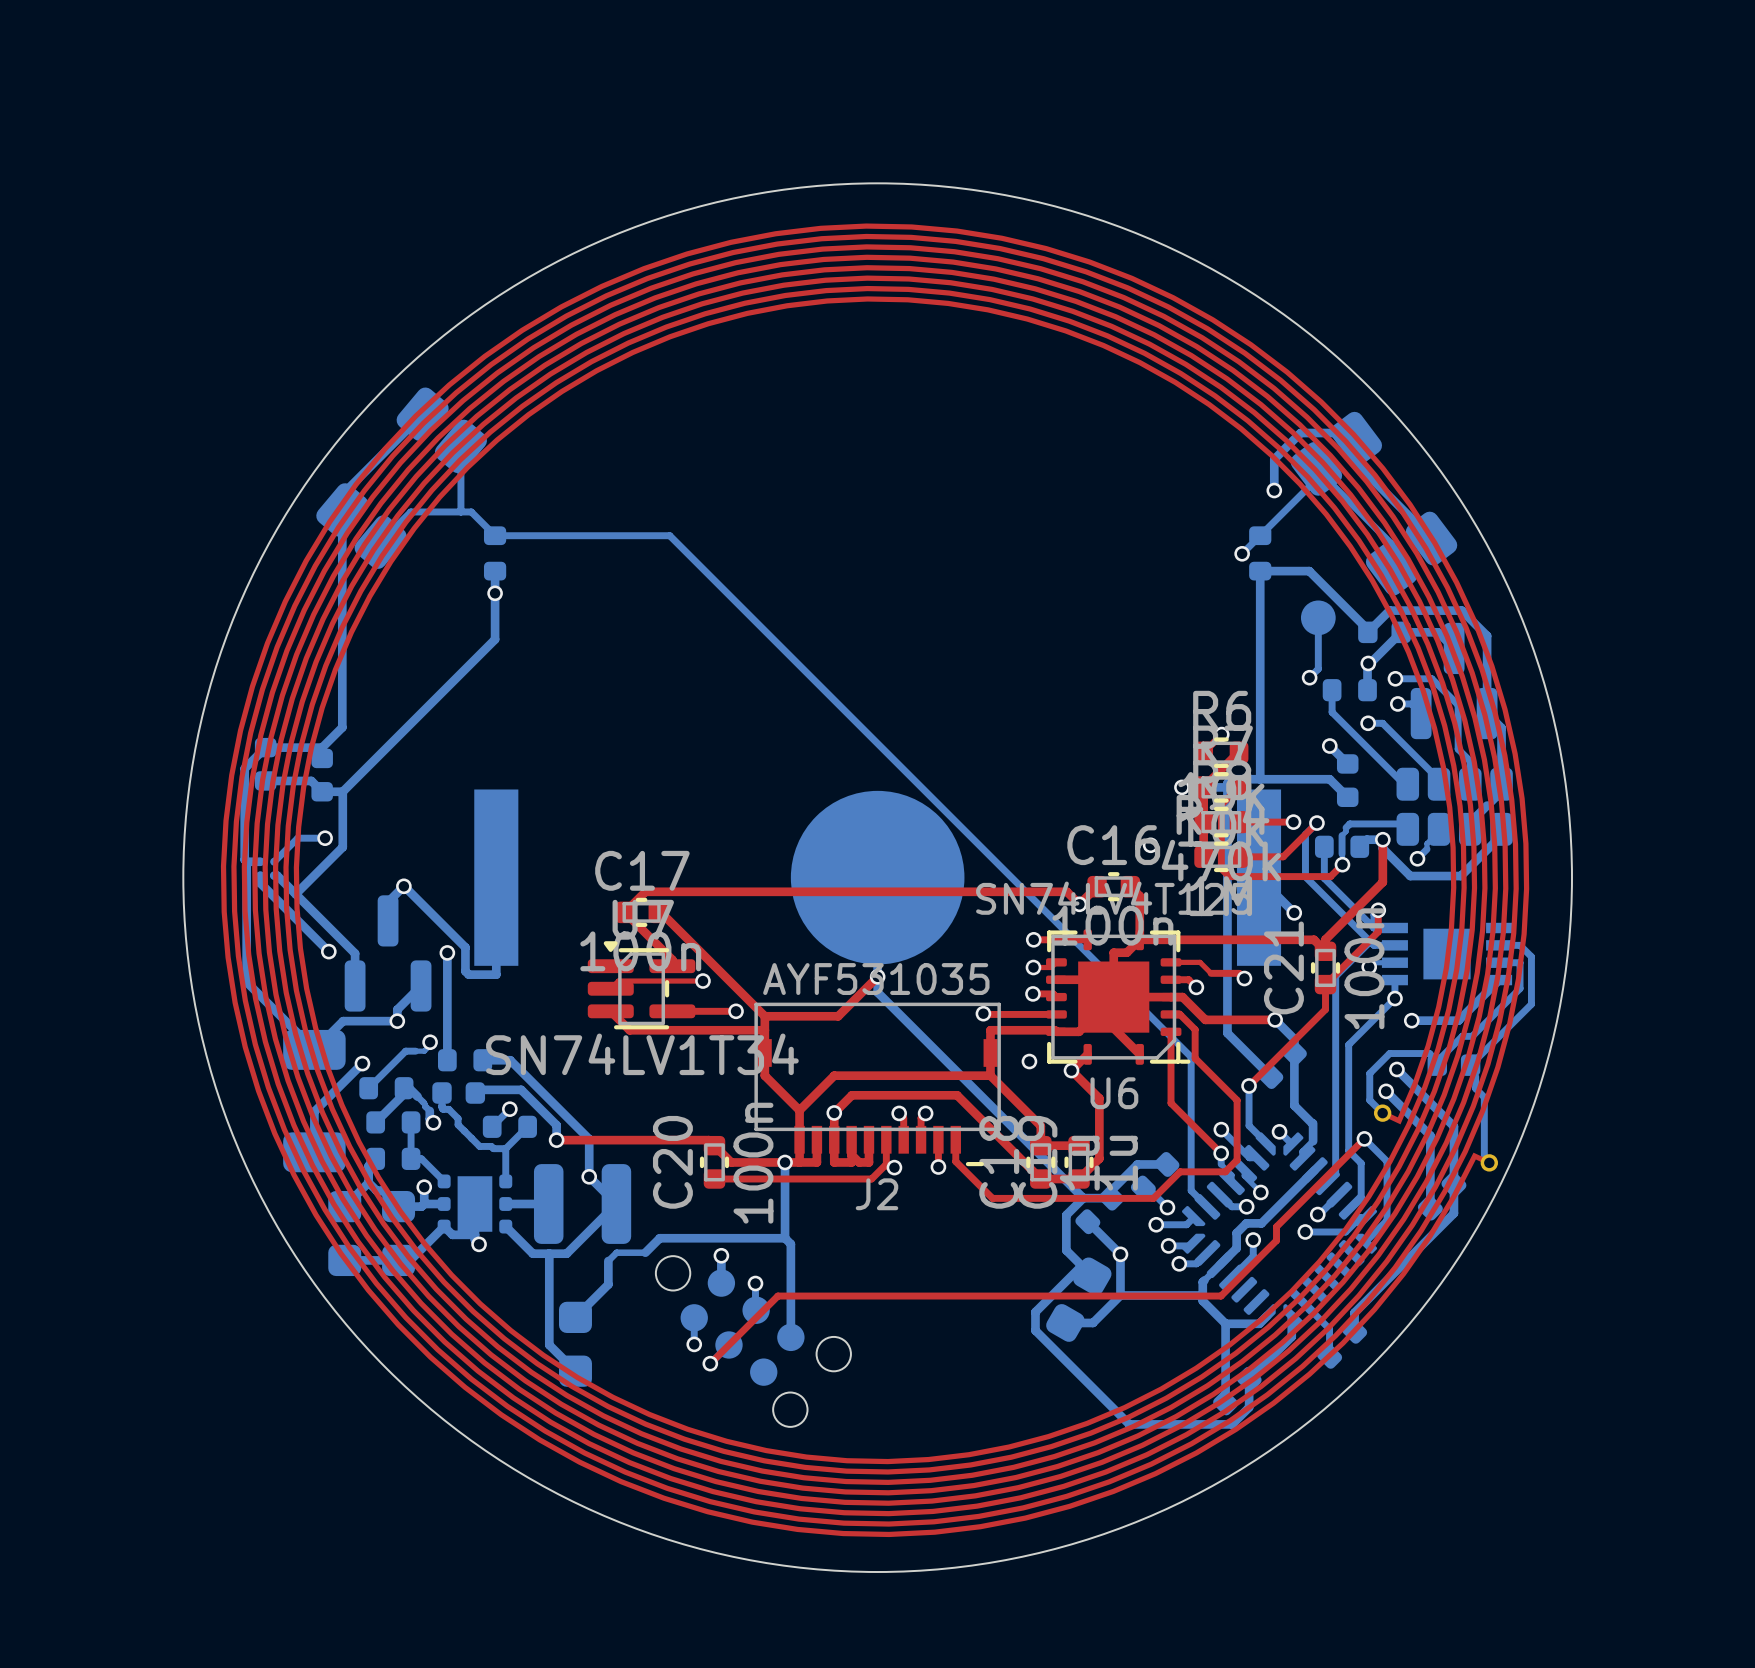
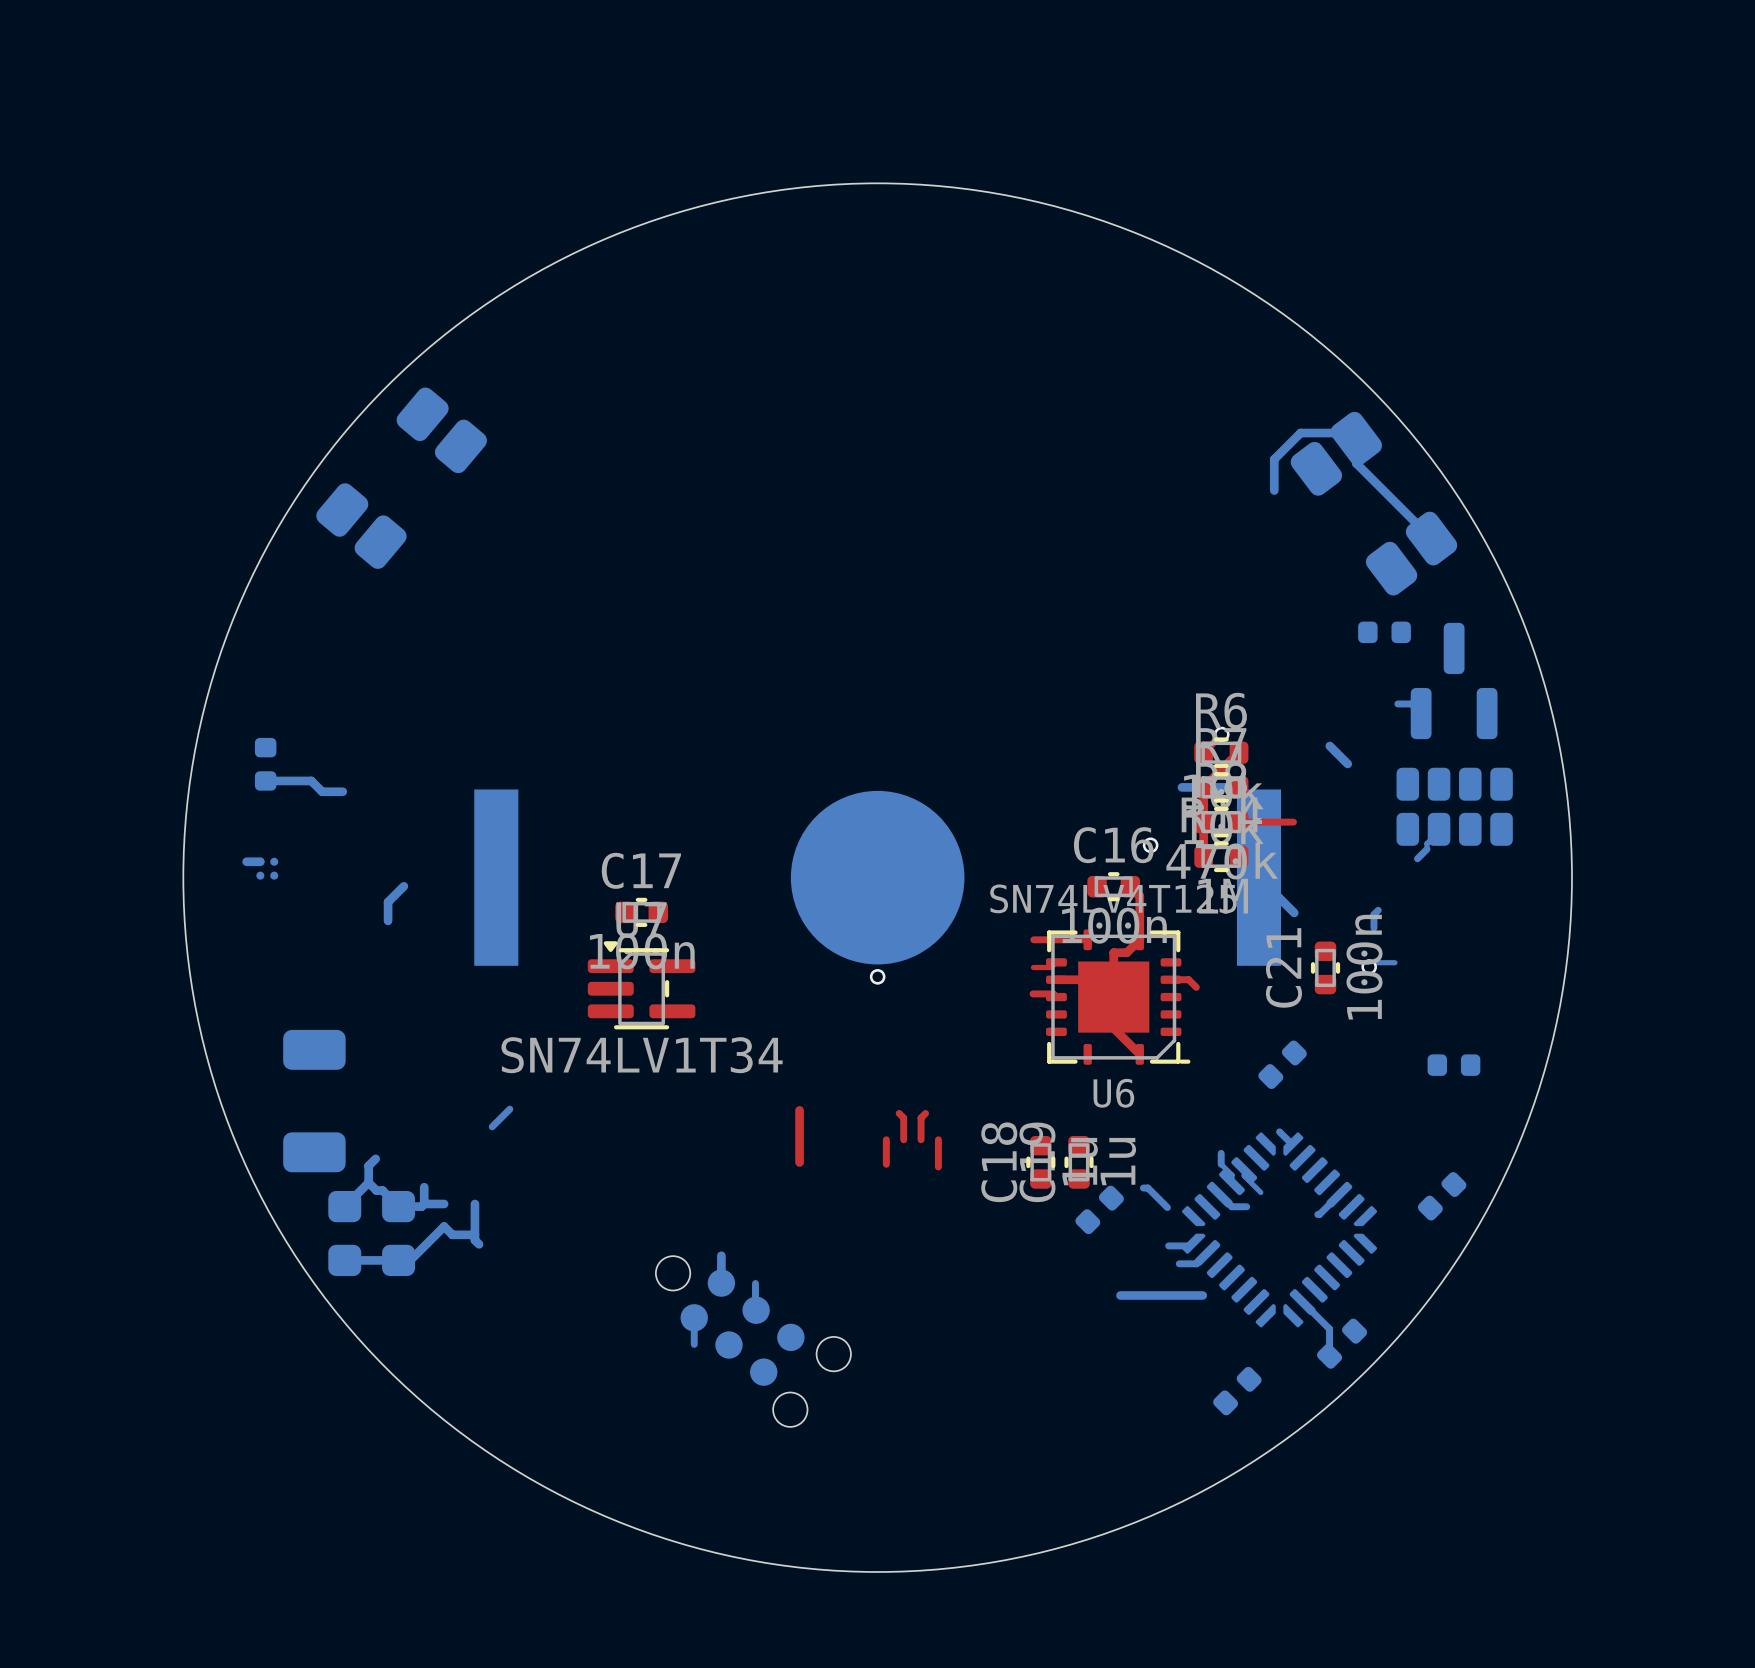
bottom track: (422, 414) (342, 494) (342, 727) (322, 747) -> none
bottom track: (460, 446) (460, 511) -> none
via: (1274, 490) -> none
bottom track: (380, 542) (410, 511) (471, 511) (495, 535) (669, 535) (1191, 1057) (1191, 1190) (1207, 1206) -> none
part: (495, 553) -> none
bottom track: (1242, 553) (1316, 479) (1316, 468) (1391, 544) (1391, 568) -> none
via: (1242, 553) -> none
part: (1260, 553) -> none
bottom track: (495, 571) (495, 639) (342, 791) (342, 847) (295, 894) -> none
via: (495, 593) -> none
bottom track: (1318, 617) (1318, 668) (1309, 677) -> none
part: (1318, 617) -> none
bottom track: (1454, 648) (1438, 632) (1401, 632) (1367, 664) (1367, 690) -> none
via: (1368, 663) -> none
via: (1309, 677) -> none
bottom track: (1395, 678) (1431, 678) (1458, 705) (1458, 749) (1470, 761) (1470, 784) -> none
via: (1395, 678) -> none
bottom track: (1332, 690) (1332, 712) (1404, 784) (1407, 784) -> none
part: (1349, 690) -> none
via: (1397, 703) -> none
bottom track: (1368, 723) (1382, 723) (1439, 779) (1439, 784) -> none
via: (1368, 723) -> none
via: (1329, 746) -> none
bottom track: (322, 747) (265, 747) (244, 768) (246, 982) (314, 1049) (343, 1021) (397, 1021) (397, 1009) (421, 985) -> none
part: (322, 775) -> none
bottom track: (1260, 779) (1260, 571) (1309, 571) (1367, 629) (1367, 632) (1389, 610) (1461, 610) (1487, 635) (1487, 713) (1501, 727) (1501, 792) (1470, 822) (1470, 829) -> none
part: (1347, 780) -> none
via: (1181, 787) -> none
top track: (1238, 787) (1221, 804) (1221, 868) (1229, 876) (1330, 876) (1342, 864) -> none
bottom track: (1347, 797) (1329, 779) (1231, 779) (1227, 783) (1227, 1033) (1270, 1076) -> none
via: (1293, 822) -> none
top track: (1316, 823) (1283, 856) (1239, 856) -> none
bottom track: (1316, 823) (1305, 834) (1305, 876) (1373, 945) (1394, 945) -> none
via: (1316, 823) -> none
bottom track: (1407, 829) (1402, 823) (1349, 823) (1342, 835) (1342, 854) -> none
bottom track: (1501, 829) (1501, 835) (1460, 876) (1410, 876) (1382, 848) (1382, 839) (1366, 839) (1359, 846) -> none
bottom track: (325, 838) (297, 838) (274, 861) -> none
via: (325, 838) -> none
top track: (1382, 839) (1382, 882) (1325, 939) (1325, 951) (1314, 939) (1139, 939) -> none
via: (1382, 839) -> none
bottom track: (1324, 846) (1324, 878) (1373, 928) (1394, 928) -> none
part: (1342, 846) -> none
via: (1417, 858) -> none
via: (1342, 864) -> none
bottom track: (260, 875) (260, 883) (328, 951) -> none
bottom track: (274, 875) (277, 875) (355, 953) (355, 985) -> none
bottom track: (496, 877) (496, 974) (468, 974) (465, 971) (465, 947) (404, 886) -> none
bottom track: (877, 877) (877, 992) (1083, 1198) -> none
part: (875, 880) -> none
via: (403, 886) -> none
top track: (1097, 886) (1079, 904) (1066, 891) (645, 891) (624, 912) (672, 959) (672, 966) -> none
via: (1079, 904) -> none
top track: (1378, 910) (1378, 931) (1325, 984) (1325, 1009) (1249, 1085) -> none
via: (1378, 910) -> none
top track: (658, 912) (660, 912) (764, 1016) -> none
via: (1294, 912) -> none
via: (1033, 939) -> none
bottom track: (1370, 941) (1335, 976) (1335, 1173) (1327, 1182) -> none
bottom track: (1499, 945) (1520, 945) (1531, 956) (1531, 1004) (1470, 1065) -> none
via: (328, 951) -> none
bottom track: (447, 952) (447, 1060) -> none
via: (447, 952) -> none
part: (388, 953) -> none
part: (1447, 954) -> none
top track: (1171, 962) (1200, 962) (1211, 973) (1239, 973) (1244, 978) -> none
bottom track: (1499, 962) (1520, 962) (1520, 988) (1472, 1036) (1462, 1036) (1437, 1061) -> none
via: (1033, 967) -> none
top track: (877, 976) (838, 1016) (764, 1016) -> none
via: (1244, 978) -> none
bottom track: (1394, 980) (1394, 998) (1348, 1044) (1348, 1150) (1361, 1163) (1361, 1197) (1351, 1206) -> none
bottom track: (1499, 980) (1458, 1020) (1411, 1020) -> none
top track: (702, 981) (618, 981) (610, 988) -> none
via: (702, 981) -> none
via: (1196, 987) -> none
via: (1032, 993) -> none
via: (1394, 998) -> none
top track: (610, 1011) (629, 1030) (764, 1030) -> none
top track: (672, 1011) (736, 1011) -> none
via: (736, 1011) -> none
top track: (983, 1013) (1056, 1014) -> none
via: (983, 1013) -> none
top track: (1171, 1014) (1179, 1014) (1195, 1029) (1195, 1058) (1237, 1100) (1237, 1160) (1225, 1171) (1180, 1171) (1153, 1198) (992, 1198) (955, 1161) (955, 1139) -> none
top track: (764, 1016) (764, 1075) (799, 1110) (834, 1075) (990, 1075) -> none
top track: (1275, 1019) (1205, 1019) (1182, 997) (1113, 997) (1079, 1031) (990, 1030) (990, 1075) -> none
bottom track: (1275, 1019) (1294, 1039) (1294, 1105) (1313, 1123) (1313, 1141) (1302, 1151) (1302, 1157) -> none
via: (1275, 1019) -> none
via: (1411, 1020) -> none
via: (397, 1021) -> none
top track: (1171, 1031) (1171, 1103) (1221, 1153) -> none
bottom track: (430, 1042) (430, 1045) (424, 1051) (405, 1051) (368, 1088) -> none
via: (430, 1042) -> none
top track: (1087, 1054) (1071, 1070) (1099, 1098) (1099, 1158) (1079, 1179) (1040, 1179) (957, 1095) (851, 1095) (834, 1112) (834, 1162) (851, 1162) (851, 1139) -> none
part: (465, 1060) -> none
bottom track: (482, 1060) (510, 1060) (589, 1139) (589, 1176) (616, 1204) (566, 1253) (532, 1253) (505, 1226) -> none
via: (1029, 1061) -> none
bottom track: (1437, 1061) (1429, 1053) (1389, 1053) (1369, 1073) (1369, 1100) (1382, 1113) -> none
bottom track: (362, 1063) (314, 1111) (314, 1152) -> none
via: (362, 1063) -> none
bottom track: (1396, 1069) (1453, 1126) (1453, 1213) (1354, 1312) (1354, 1331) -> none
via: (1396, 1069) -> none
via: (1071, 1070) -> none
top track: (990, 1075) (1040, 1126) (1040, 1145) (1079, 1145) -> none
bottom track: (1475, 1076) (1475, 1088) (1484, 1097) (1484, 1156) -> none
J2: AYF531035 (877, 1084) -> none
bottom track: (1249, 1085) (1249, 1125) (1267, 1144) -> none
via: (1249, 1085) -> none
part: (386, 1088) -> none
bottom track: (1386, 1091) (1430, 1135) (1430, 1208) -> none
via: (1386, 1091) -> none
part: (458, 1093) -> none
bottom track: (475, 1093) (478, 1089) (521, 1089) (556, 1125) (556, 1140) -> none
bottom track: (442, 1107) (443, 1109) (448, 1109) (458, 1118) (458, 1124) (479, 1146) (505, 1148) -> none
via: (509, 1109) -> none
via: (834, 1112) -> none
via: (899, 1113) -> none
via: (925, 1113) -> none
bottom track: (375, 1122) (404, 1093) (404, 1088) (409, 1088) (425, 1104) (429, 1110) (429, 1119) (433, 1122) -> none
part: (393, 1122) -> none
bottom track: (411, 1122) (411, 1158) (421, 1158) (444, 1181) -> none
via: (433, 1122) -> none
part: (509, 1126) -> none
bottom track: (527, 1126) (505, 1148) -> none
bottom track: (1221, 1129) (1249, 1157) (1256, 1157) -> none
via: (1221, 1129) -> none
via: (1279, 1131) -> none
top track: (1364, 1138) (1276, 1226) (1276, 1240) (1221, 1296) (777, 1296) (710, 1363) -> none
bottom track: (1364, 1138) (1387, 1161) (1387, 1220) (1365, 1242) -> none
via: (1364, 1138) -> none
top track: (816, 1139) (816, 1162) (731, 1162) (708, 1140) (556, 1140) -> none
top track: (868, 1139) (868, 1162) (859, 1162) (851, 1154) -> none
via: (556, 1140) -> none
bottom track: (505, 1148) (505, 1181) -> none
via: (1221, 1153) -> none
part: (393, 1158) -> none
C20: 100n (714, 1162) -> none
bottom track: (785, 1162) (785, 1238) -> none
via: (785, 1162) -> none
bottom track: (1166, 1164) (1137, 1164) (1111, 1190) (1111, 1198) (1083, 1198) -> none
top track: (894, 1167) (889, 1167) (886, 1164) (871, 1179) (714, 1179) -> none
via: (894, 1167) -> none
via: (938, 1167) -> none
bottom track: (1314, 1170) (1261, 1223) (1246, 1223) (1236, 1233) (1236, 1248) (1202, 1282) (1202, 1300) (1225, 1323) -> none
via: (589, 1176) -> none
part: (1155, 1176) -> none
via: (424, 1187) -> none
via: (1260, 1192) -> none
bottom track: (1083, 1198) (1066, 1215) (1066, 1250) (1081, 1265) -> none
part: (474, 1204) -> none
bottom track: (505, 1204) (548, 1204) -> none
part: (582, 1204) -> none
via: (1246, 1206) -> none
via: (1167, 1207) -> none
via: (1317, 1214) -> none
bottom track: (1193, 1217) (1186, 1224) (1156, 1224) -> none
bottom track: (1365, 1217) (1360, 1217) (1345, 1231) (1305, 1231) -> none
bottom track: (1087, 1221) (1120, 1254) (1120, 1295) (1092, 1322) (1065, 1322) -> none
via: (1156, 1224) -> none
via: (1305, 1231) -> none
bottom track: (785, 1238) (790, 1244) (790, 1337) -> none
bottom track: (785, 1238) (659, 1238) (645, 1252) (616, 1252) (608, 1261) (608, 1284) (575, 1317) -> none
bottom track: (1253, 1240) (1253, 1256) (1231, 1277) -> none
via: (1253, 1240) -> none
via: (479, 1244) -> none
via: (1168, 1245) -> none
bottom track: (549, 1253) (549, 1345) (575, 1371) -> none
via: (1120, 1254) -> none
via: (721, 1255) -> none
via: (1179, 1263) -> none
bottom track: (1081, 1265) (1035, 1312) (1035, 1330) (1129, 1424) (1232, 1424) (1249, 1407) (1249, 1379) (1291, 1336) (1291, 1315) -> none
via: (755, 1283) -> none
part: (1078, 1299) -> none
bottom track: (1267, 1315) (1259, 1323) (1225, 1323) -> none
bottom track: (1225, 1323) (1225, 1402) -> none
part: (575, 1344) -> none
via: (694, 1344) -> none
via: (710, 1363) -> none

